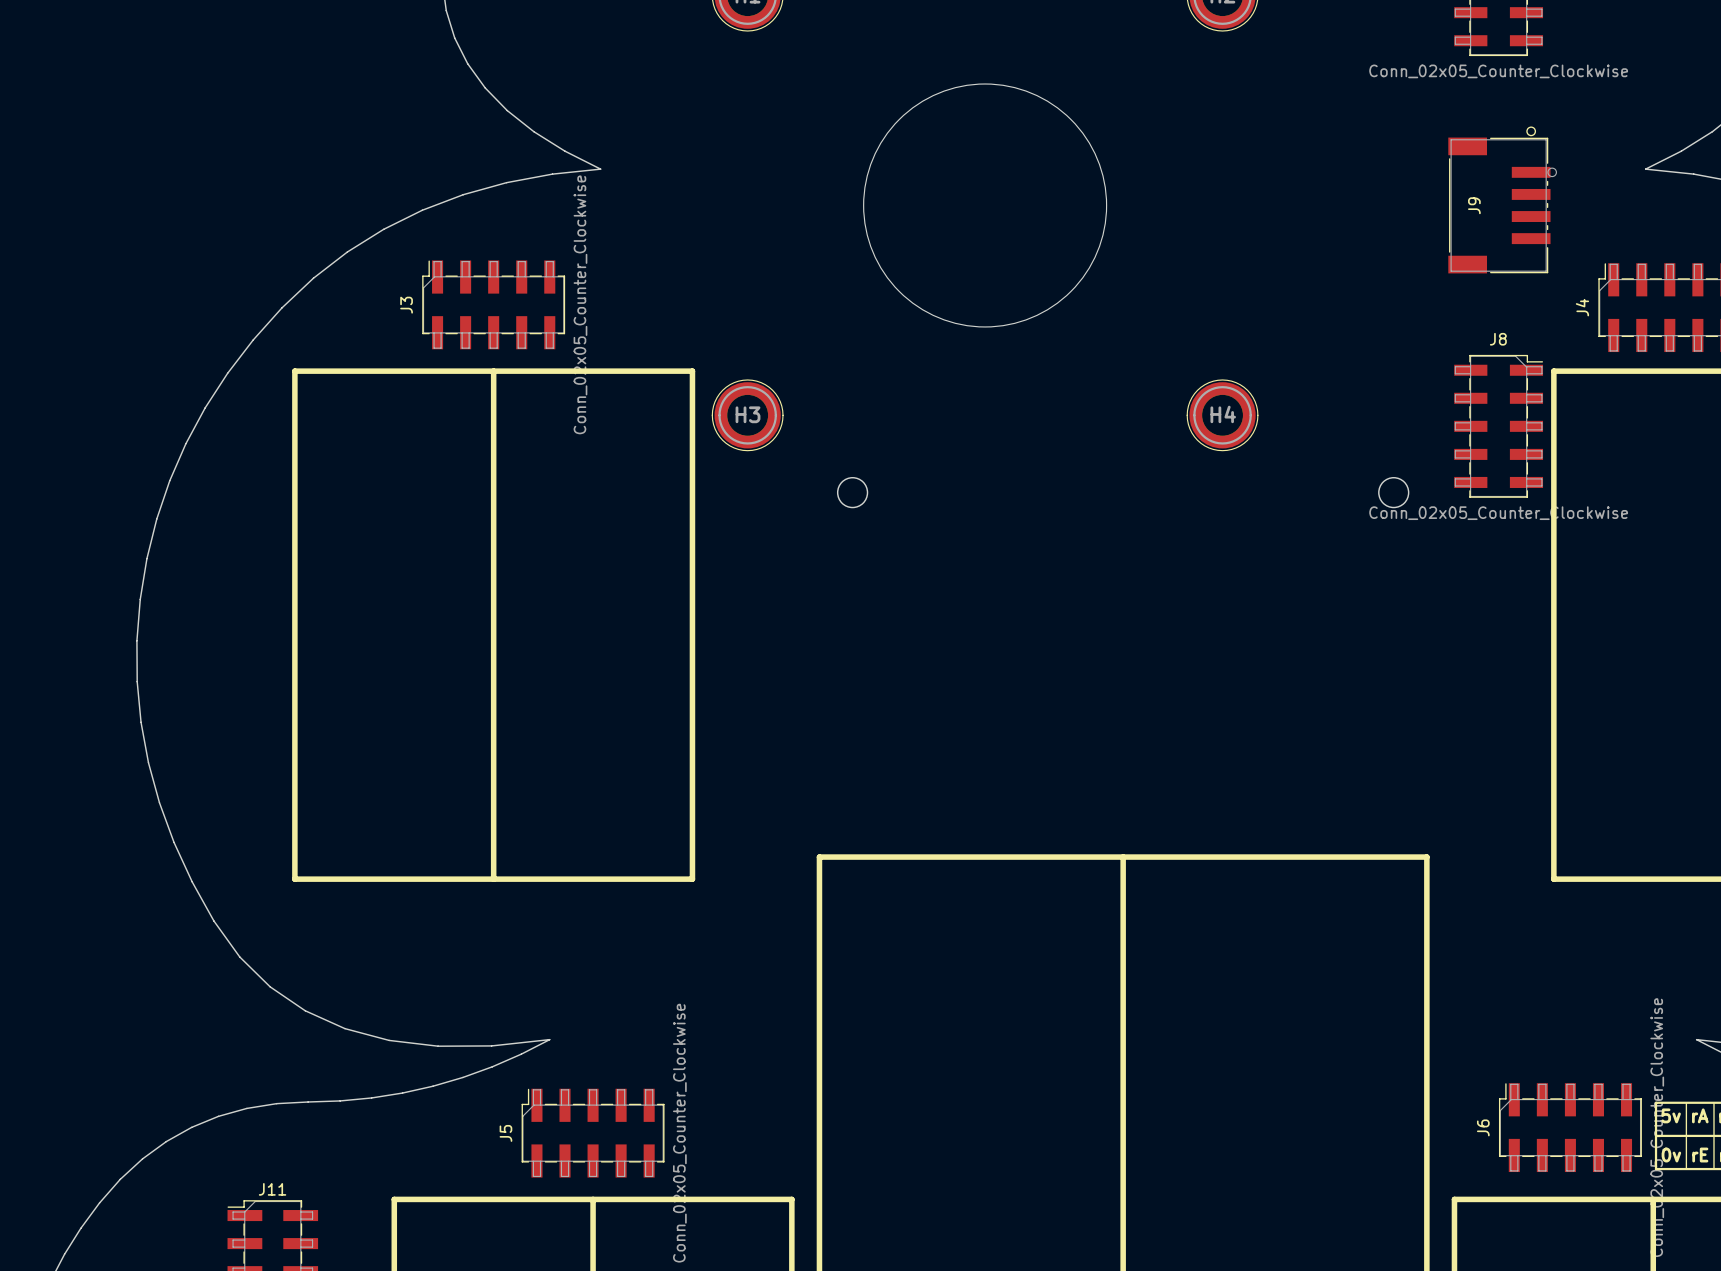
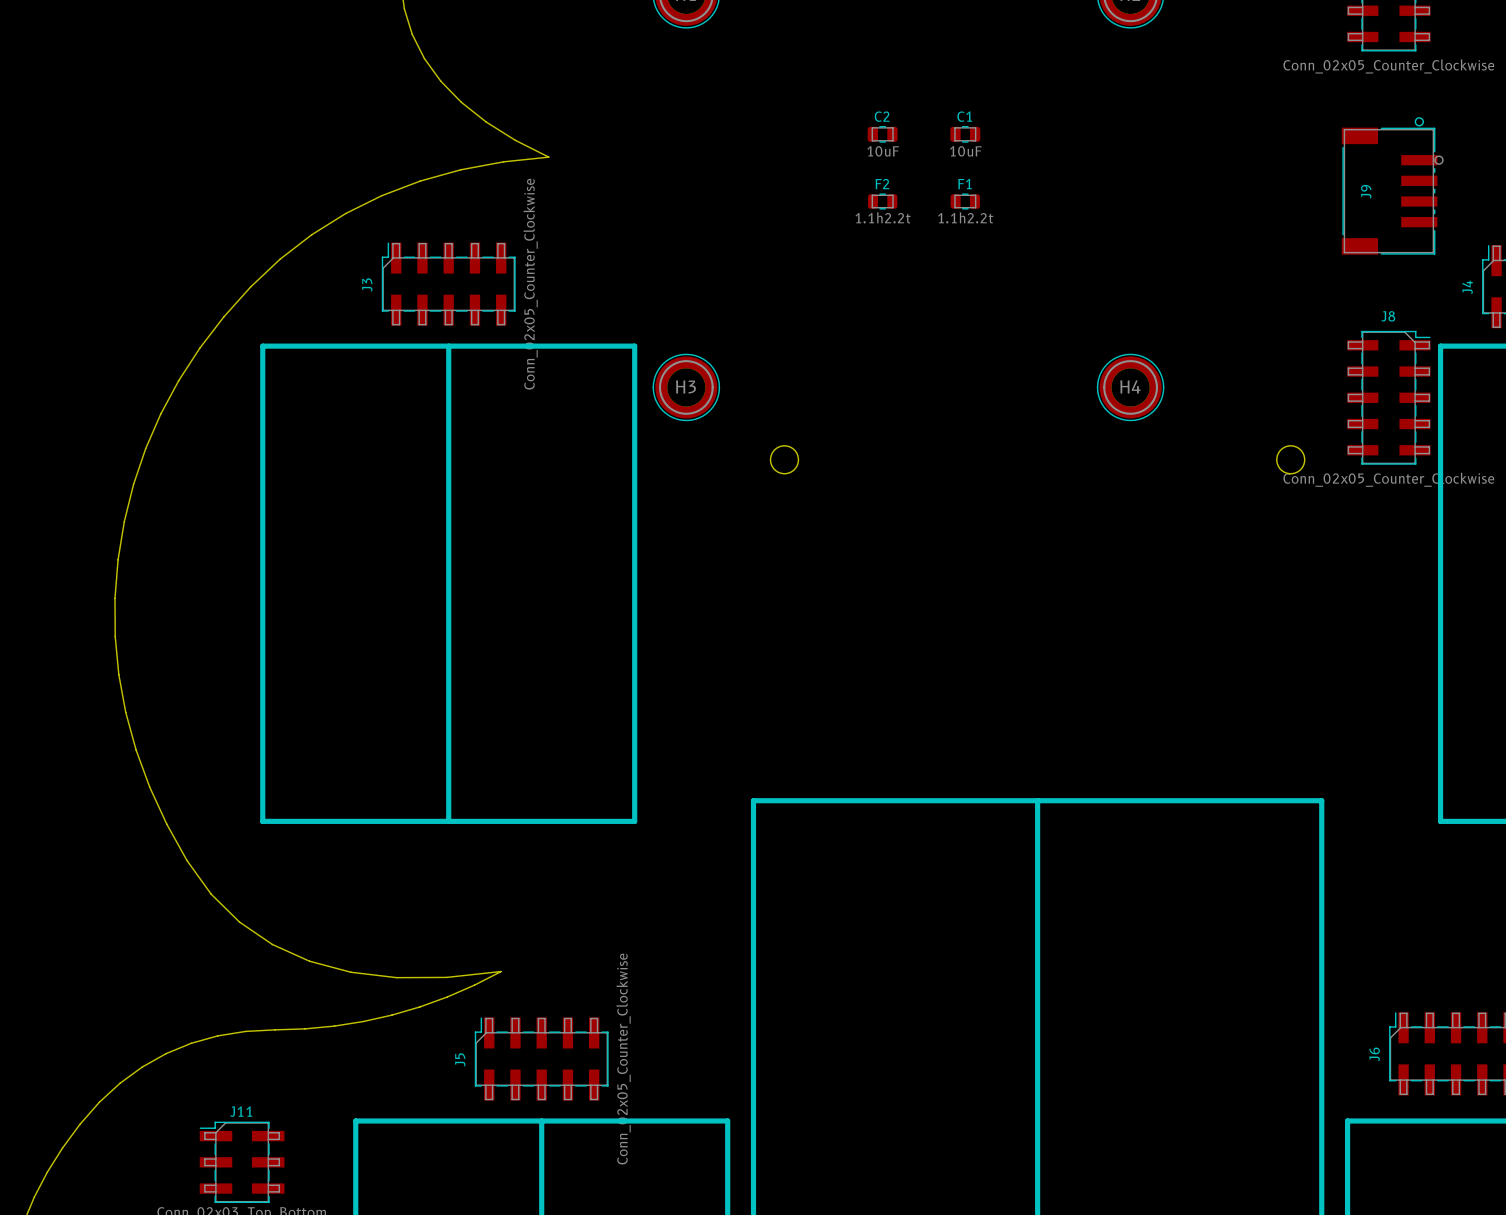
round board edge: [863, 83, 1107, 328] -> none
C2: none -> 10uF (882, 134)
C1: none -> 10uF (965, 134)
F2: none -> 1.1h2.2t (882, 201)
F1: none -> 1.1h2.2t (965, 201)

